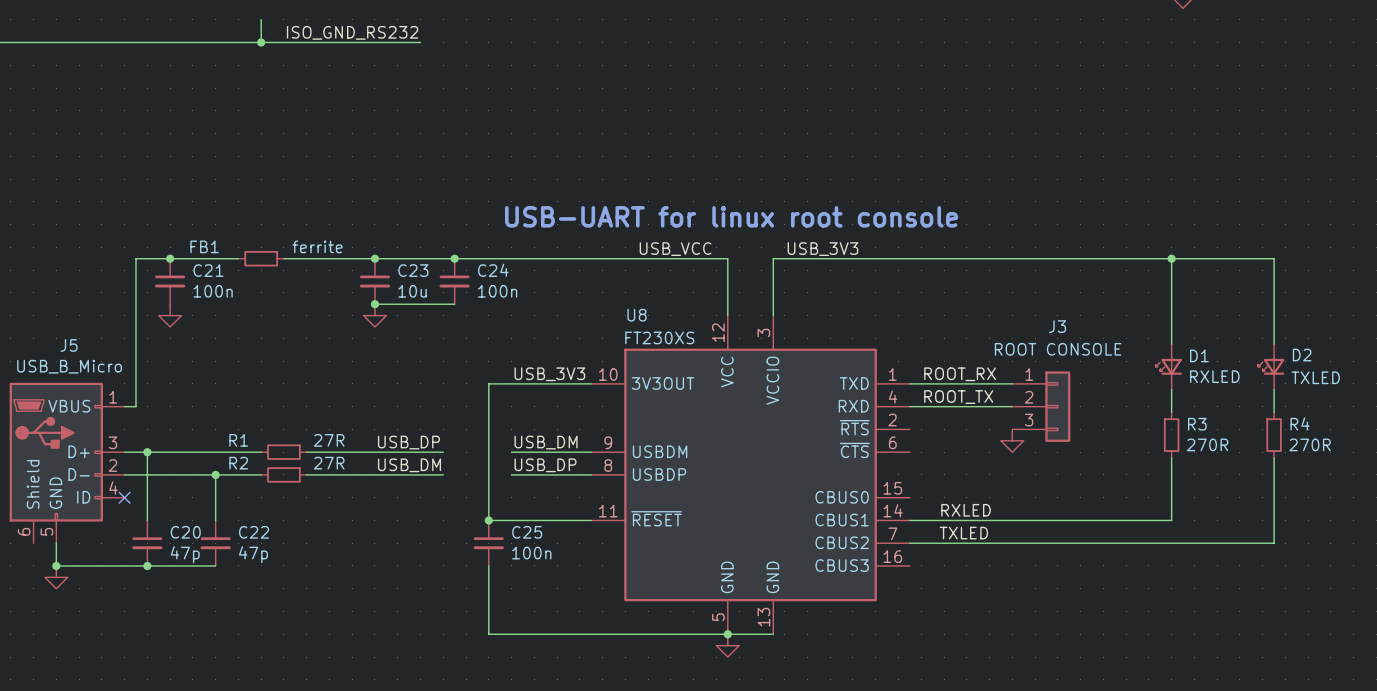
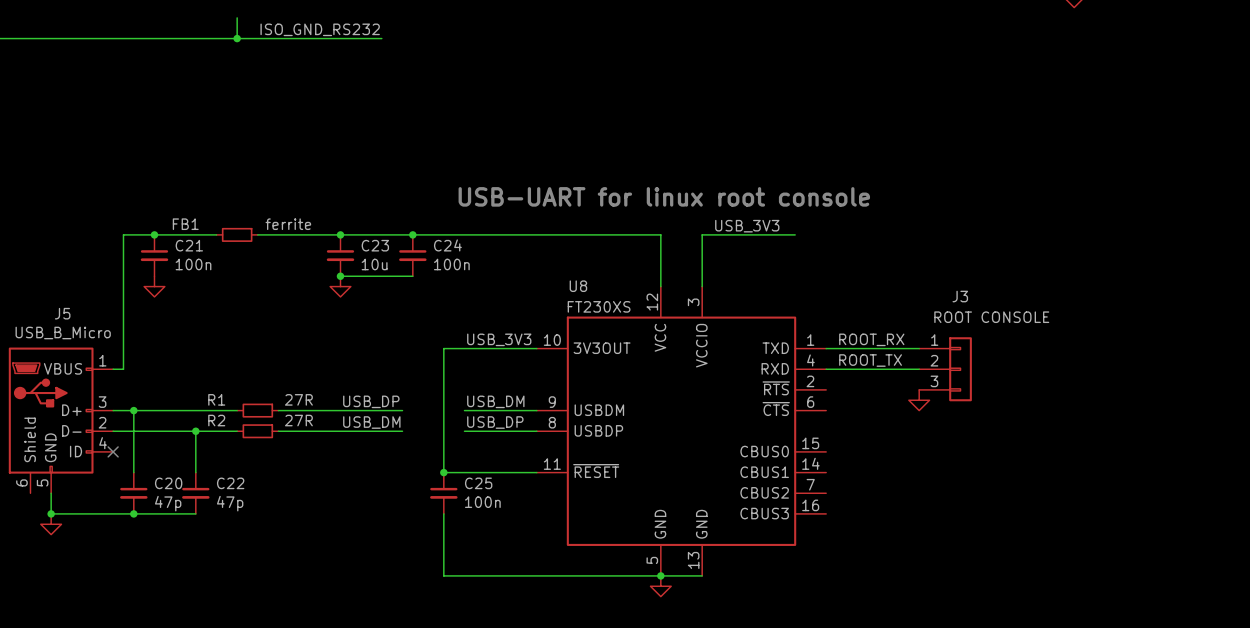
label: USB_VCC (675, 249) -> none
wire: (875, 258) (1274, 258) (1274, 344) -> none
wire: (1171, 258) (1171, 344) -> none
junction: (1171, 258) -> none
J3 value position: ROOT CONSOLE (1058, 349) -> ROOT CONSOLE (991, 317)
D1: RXLED (1168, 366) -> none
D2: TXLED (1271, 366) -> none
wire: (1171, 389) (1171, 412) -> none
wire: (1274, 389) (1274, 412) -> none
R3: 270R (1171, 435) -> none
R4: 270R (1274, 435) -> none
wire: (1171, 457) (1171, 520) (909, 520) -> none
wire: (1274, 457) (1274, 543) (909, 543) -> none
label: RXLED (966, 510) -> none
label: TXLED (963, 533) -> none

